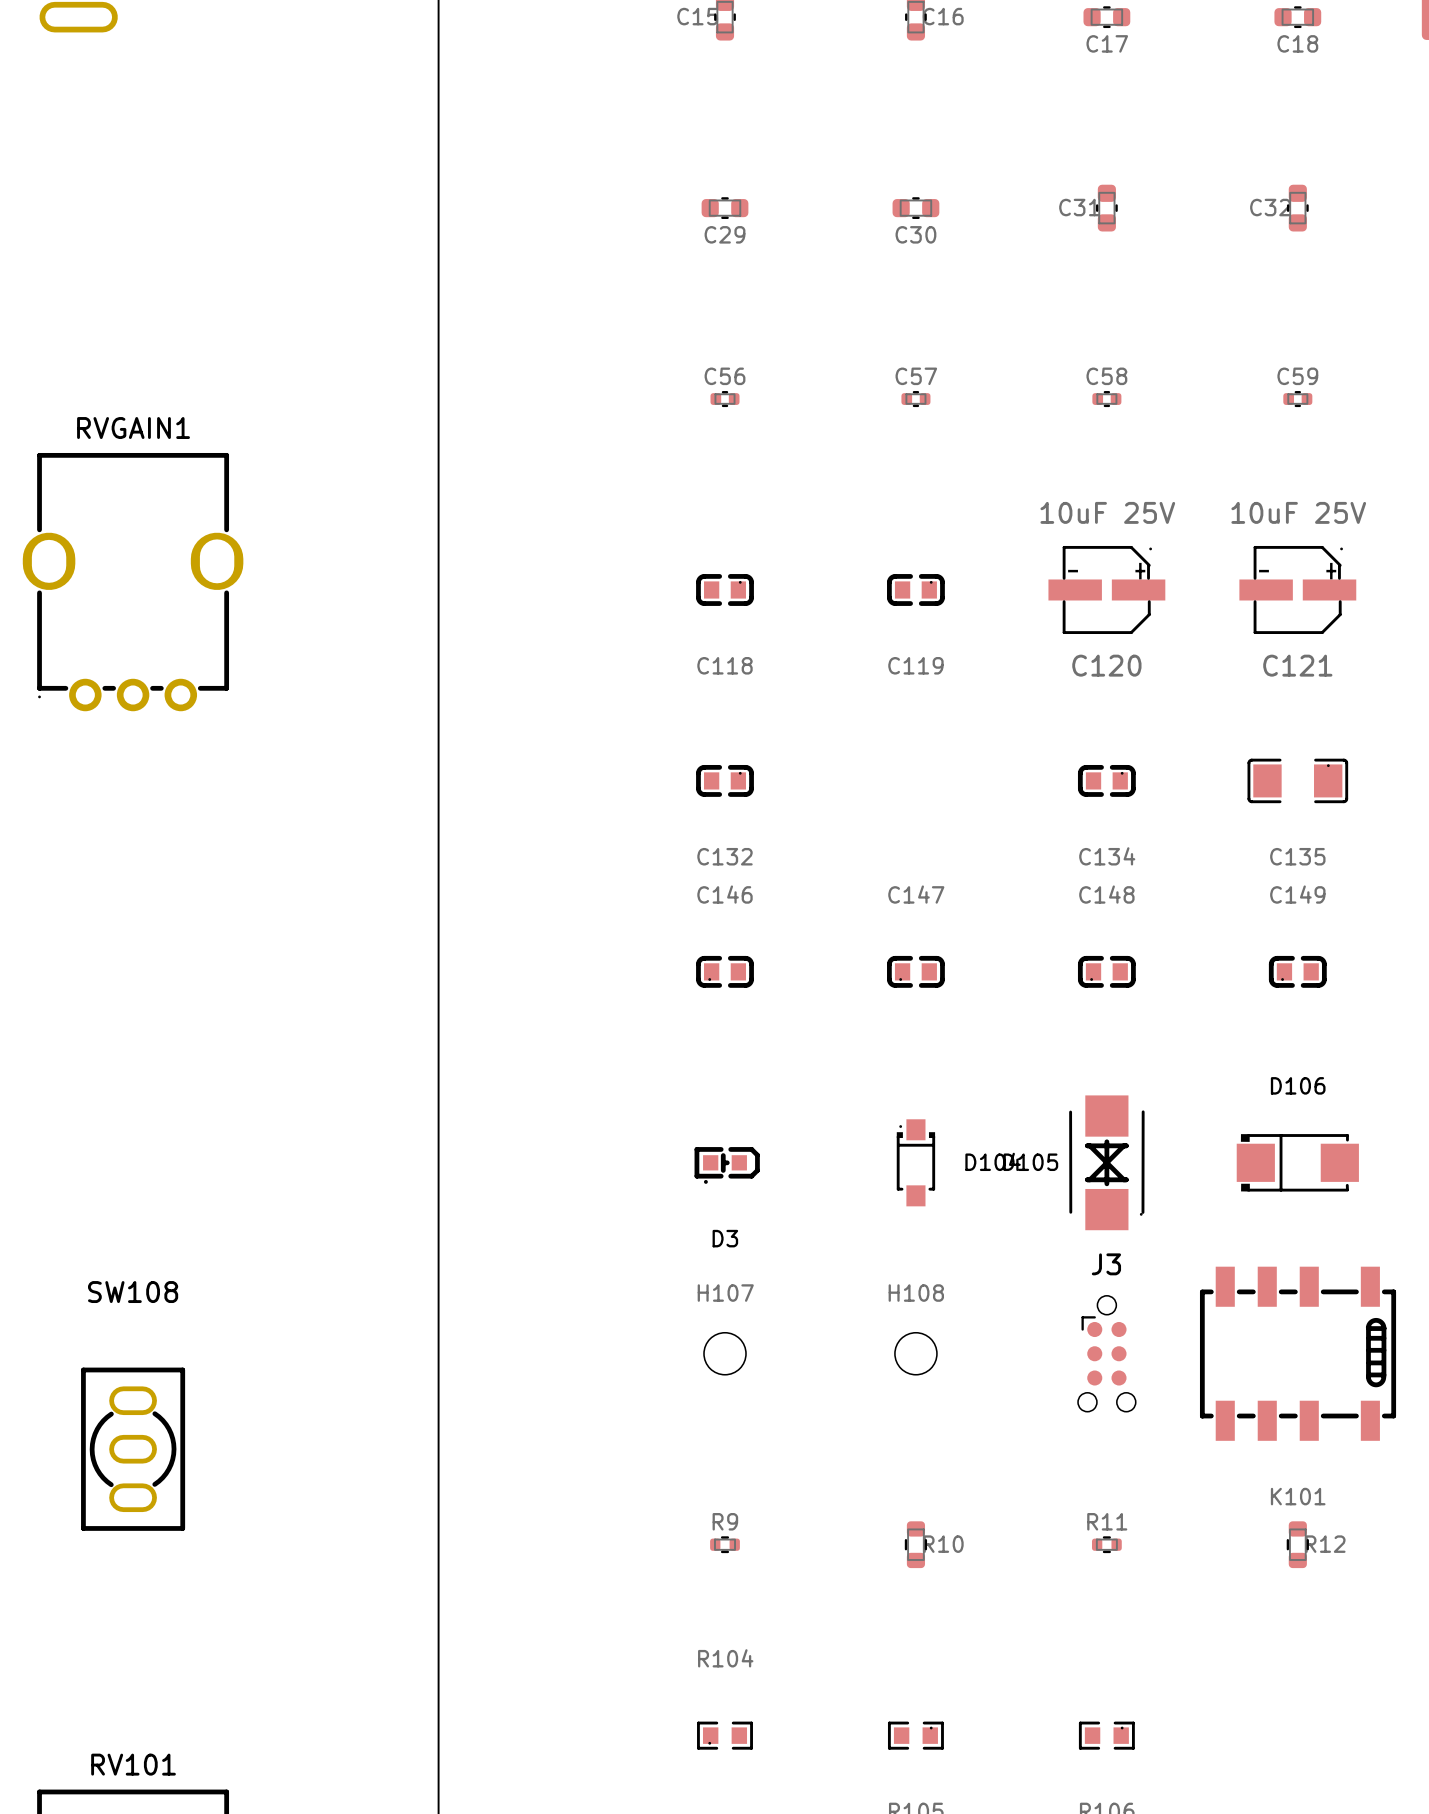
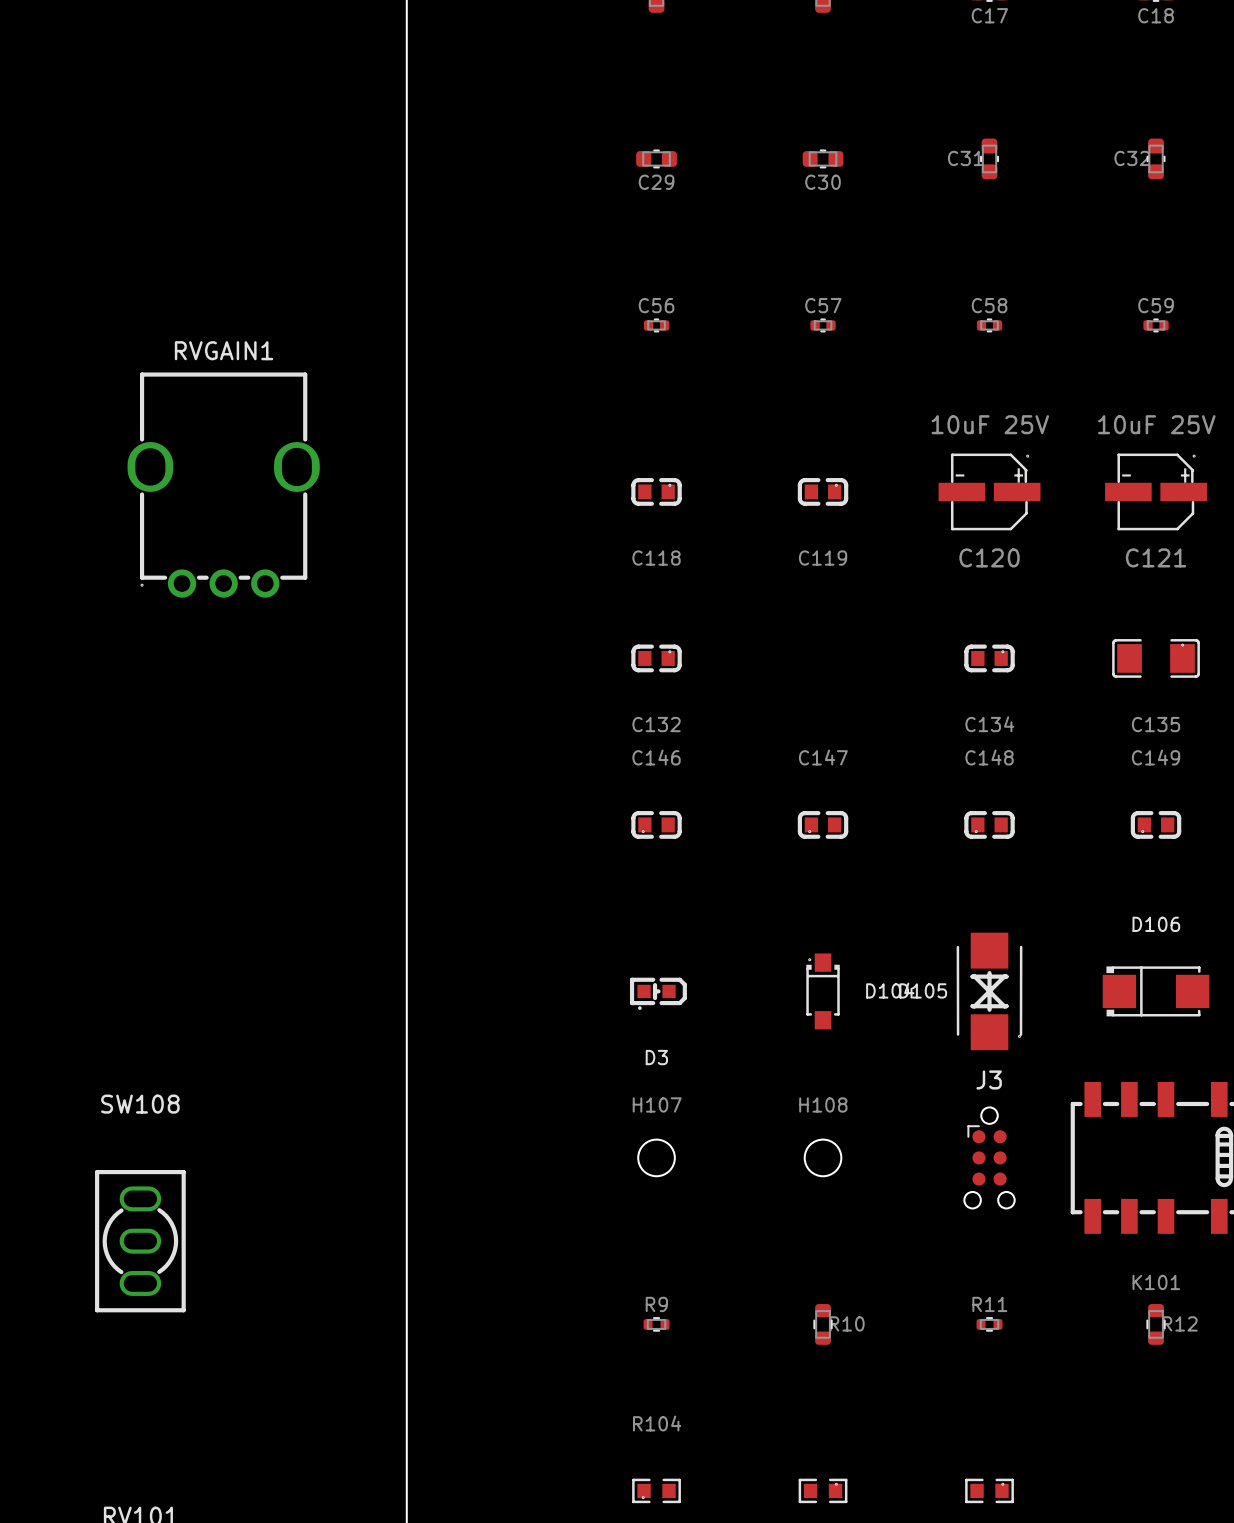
RVGAIN1 position: (133, 582) -> (223, 485)

